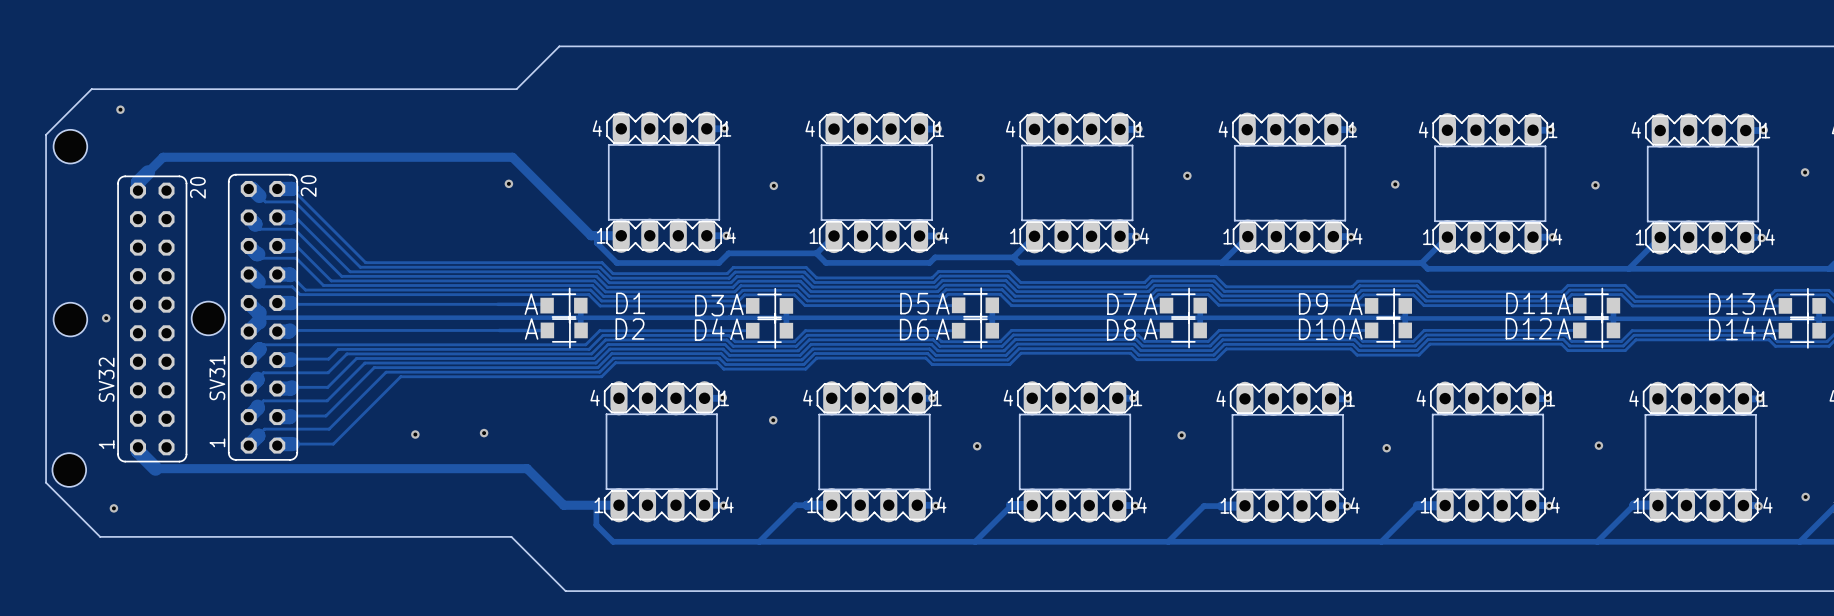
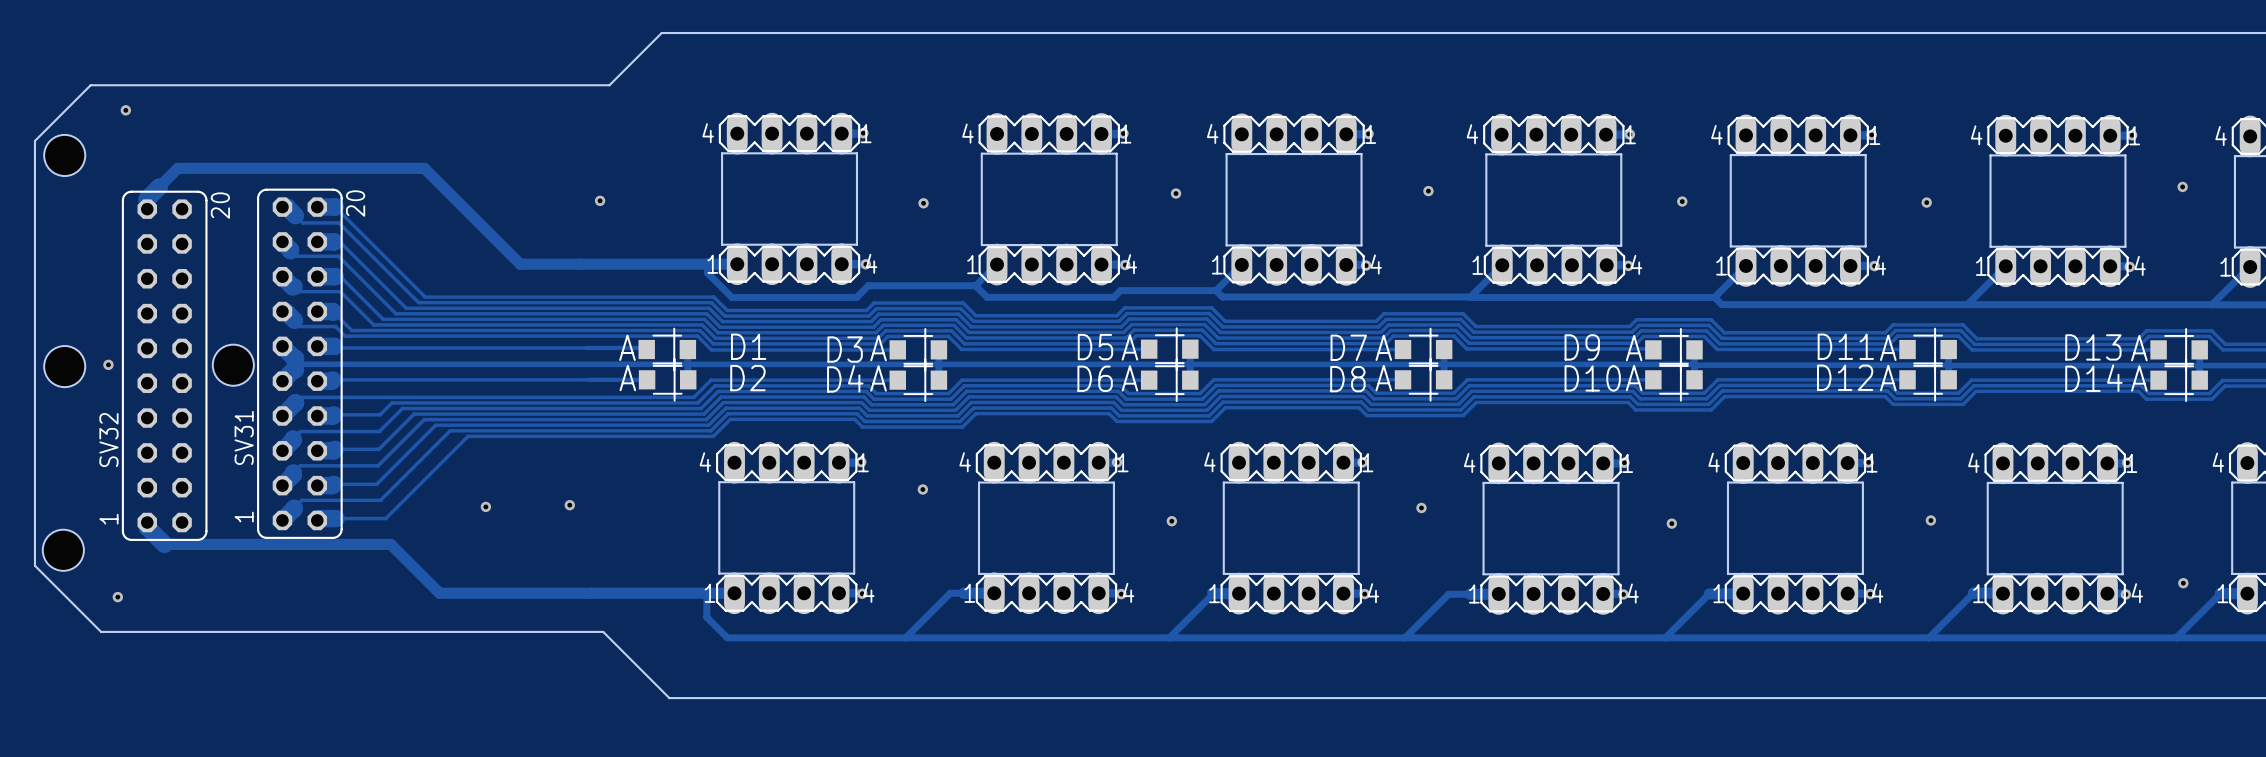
track: (365, 157) (512, 157) (591, 235) -> (424, 168) (520, 264) (700, 264)
track: (152, 465) (155, 468) (527, 468) (563, 505) -> (164, 544) (390, 544) (439, 593) (667, 593)

